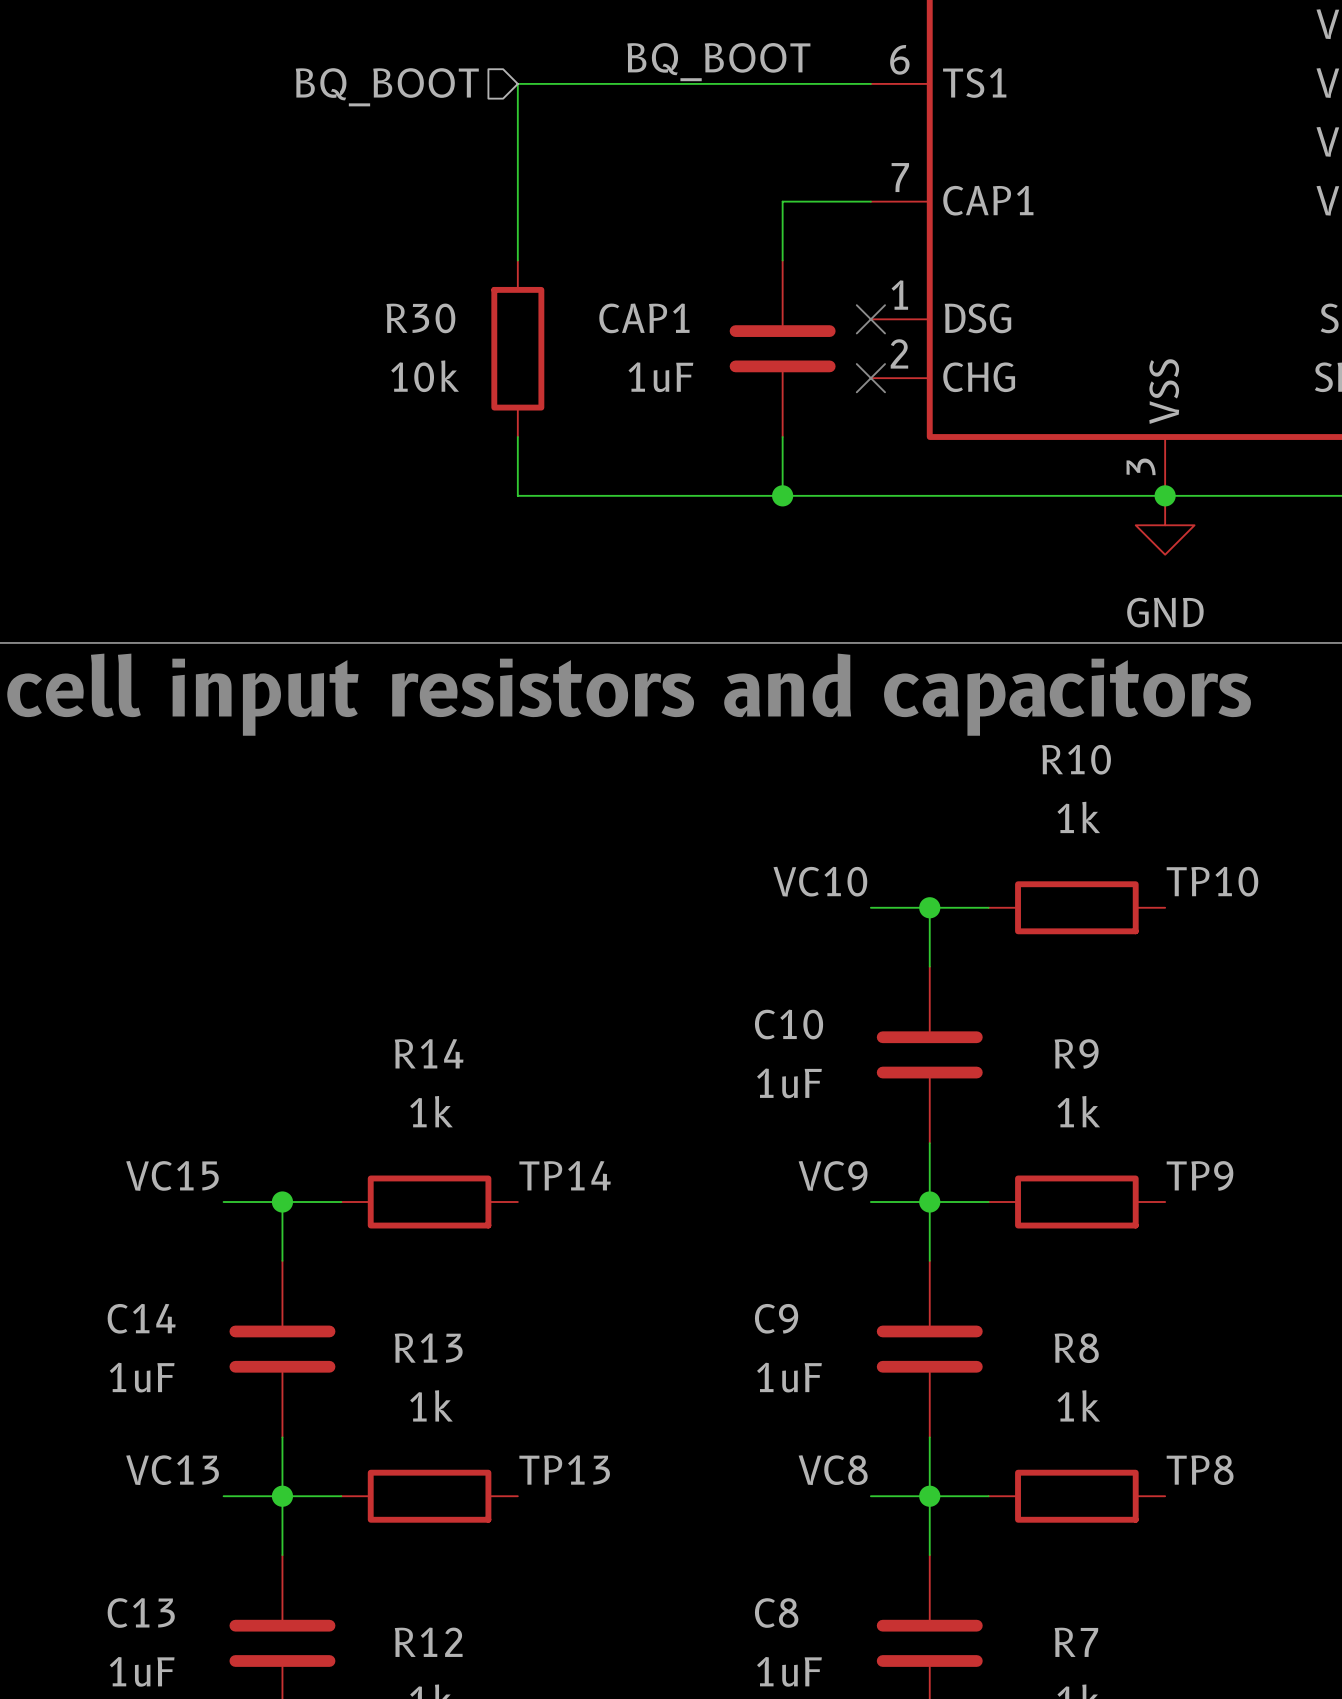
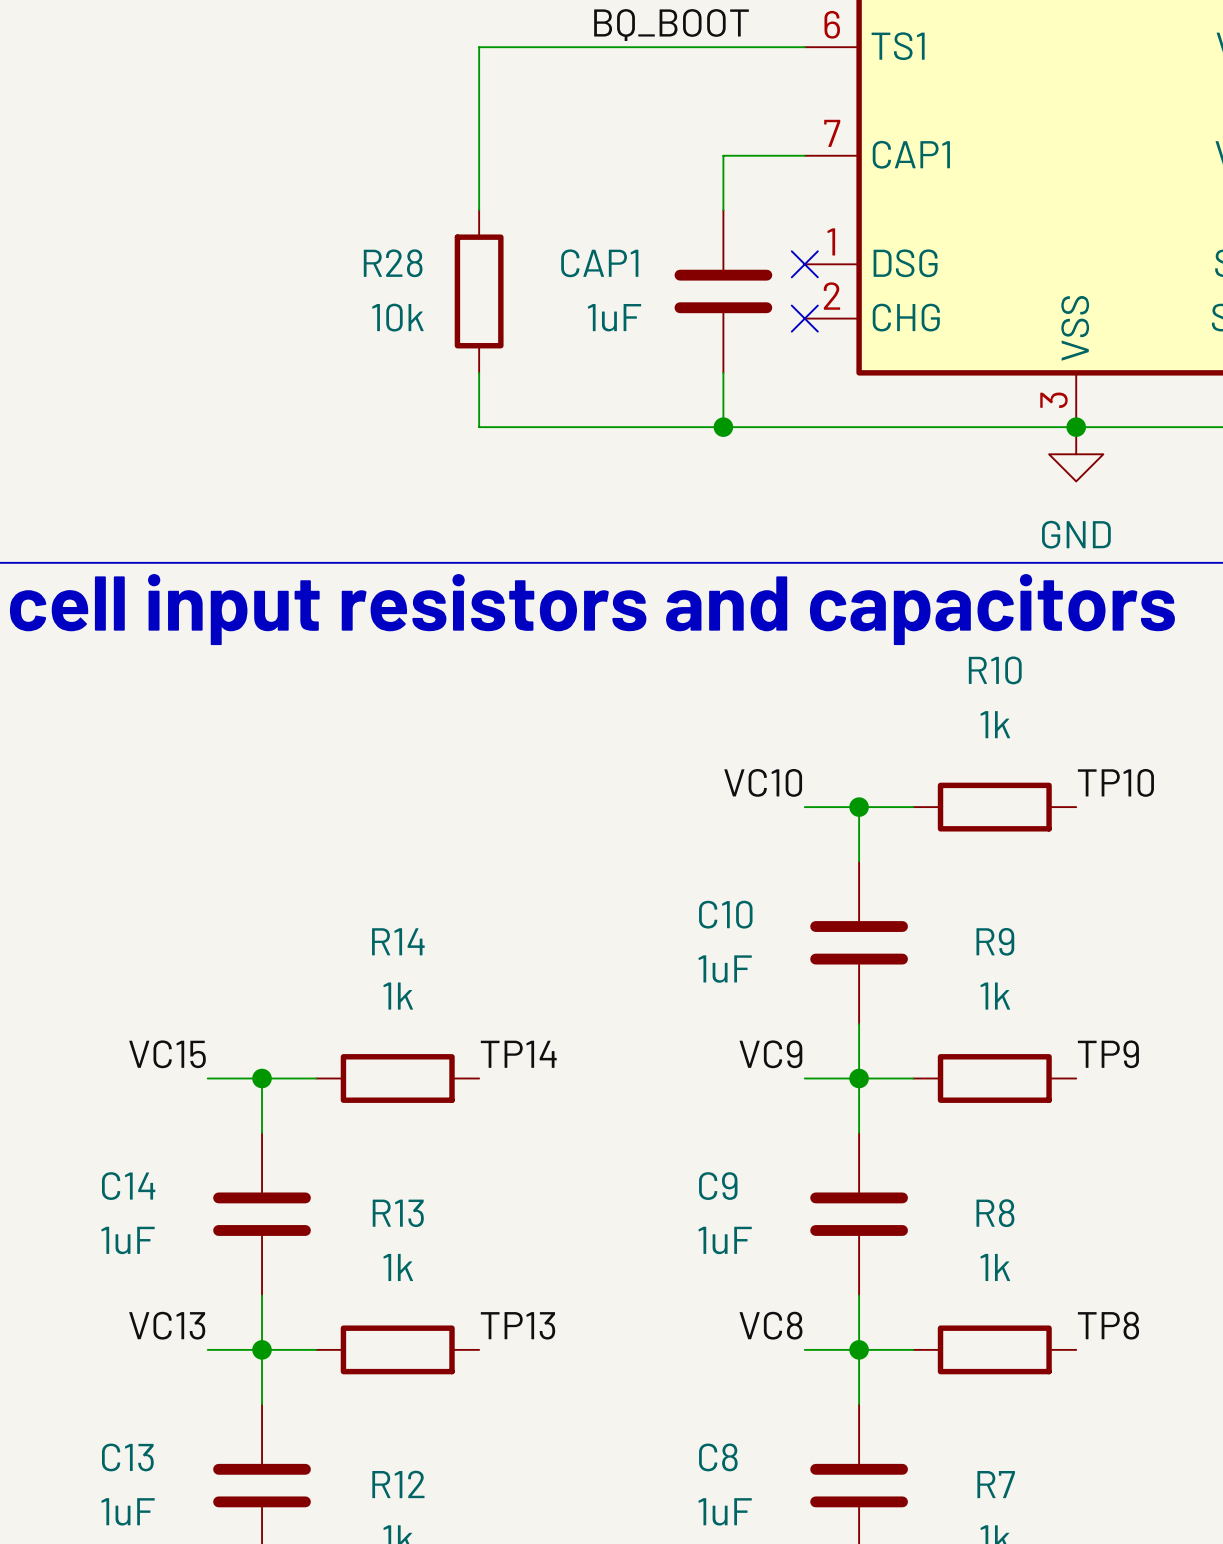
hierarchical label: BQ_BOOT (387, 87) -> none
R30 name: R30 (420, 318) -> R28 (393, 263)

